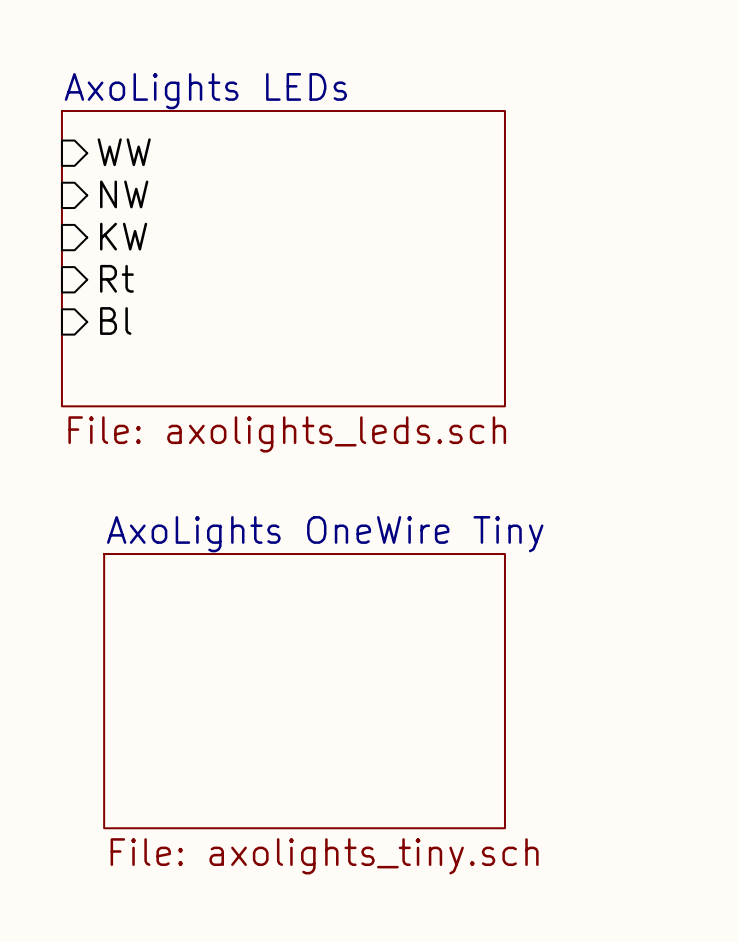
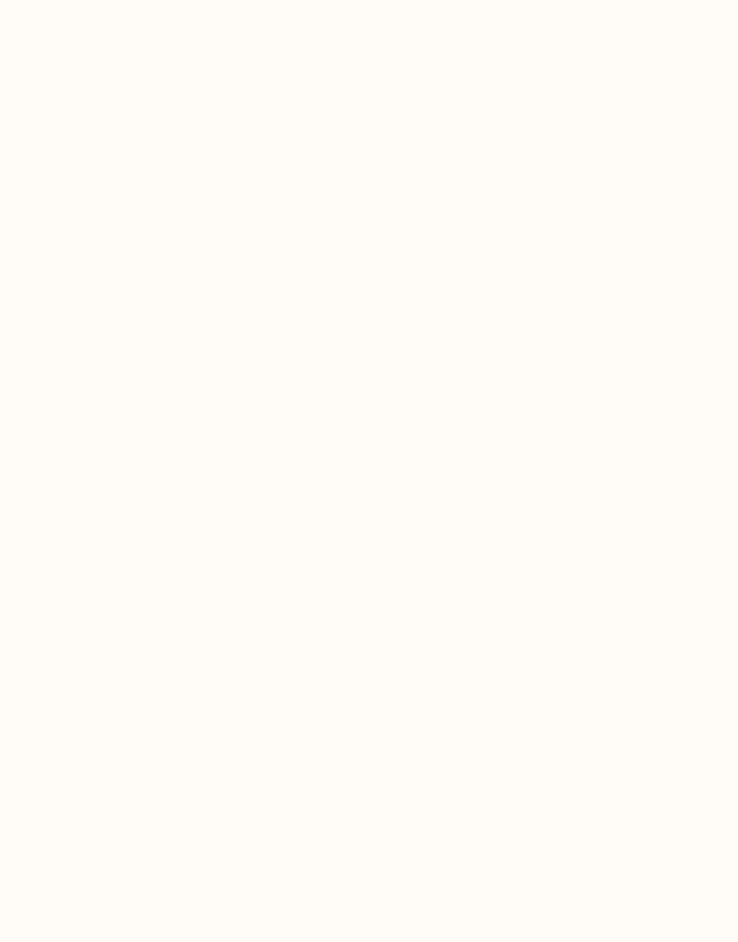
sheet pin: WW (124, 152) -> none
sheet pin: NW (124, 194) -> none
sheet pin: KW (123, 236) -> none
sheet AxoLights LEDs: File: axolights_leds.sch (283, 258) -> none
sheet pin: Rt (116, 278) -> none
sheet pin: Bl (115, 321) -> none
sheet AxoLights OneWire Tiny: File: axolights_tiny.sch (304, 691) -> none

